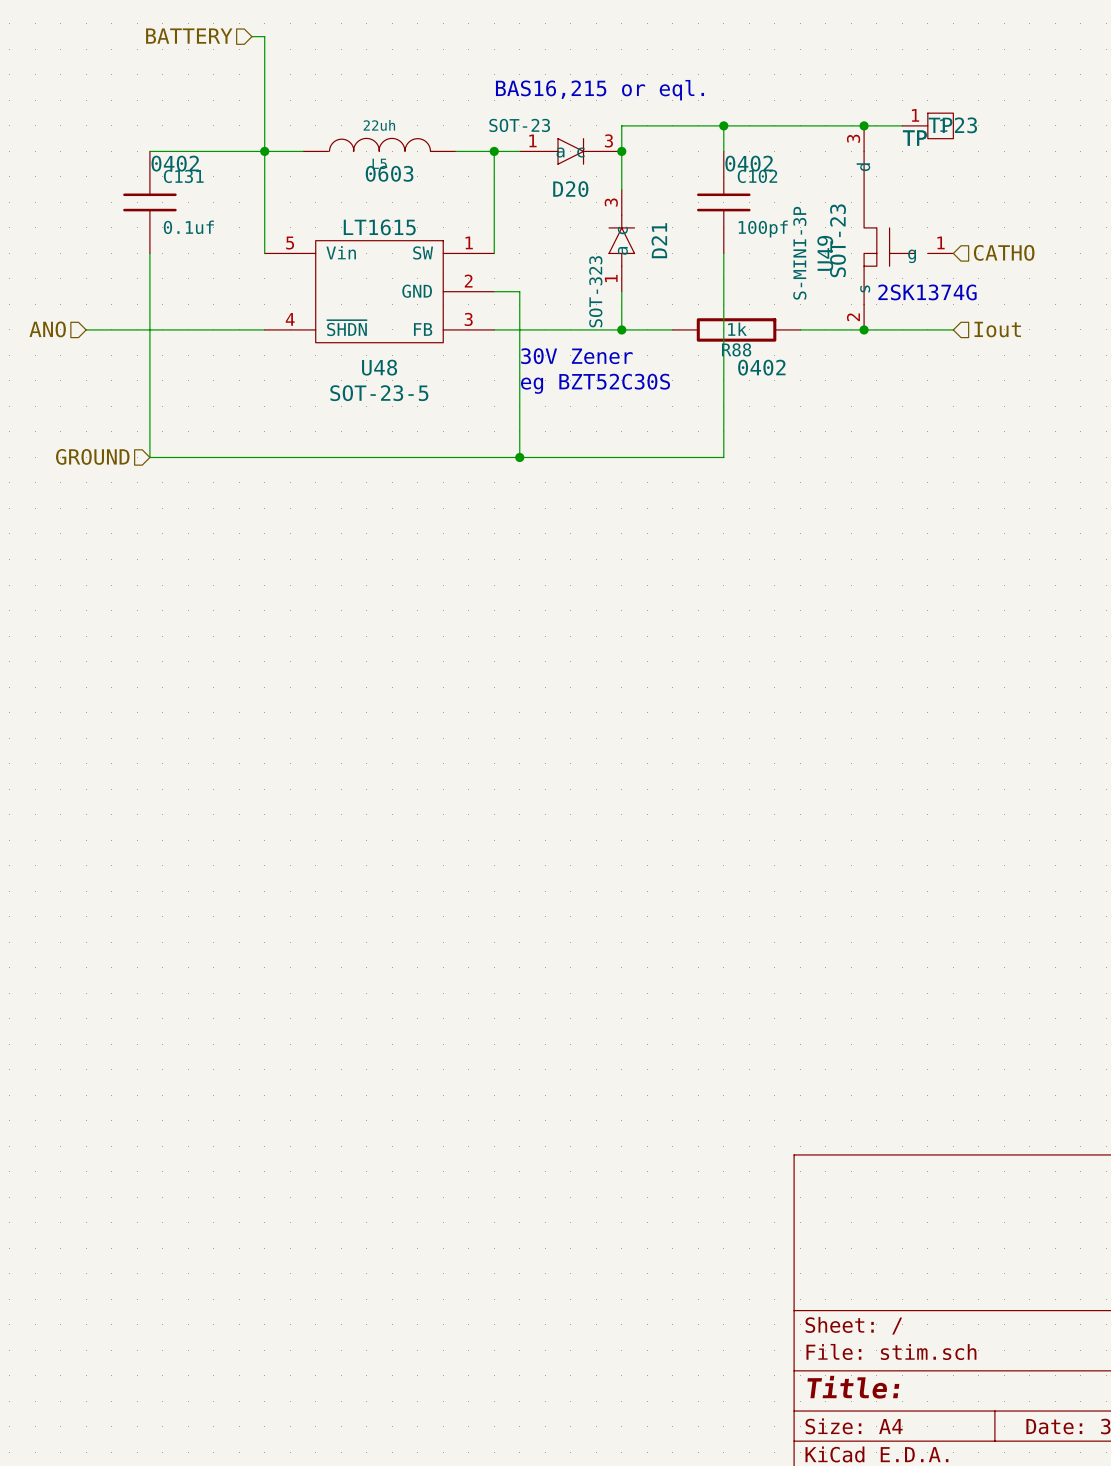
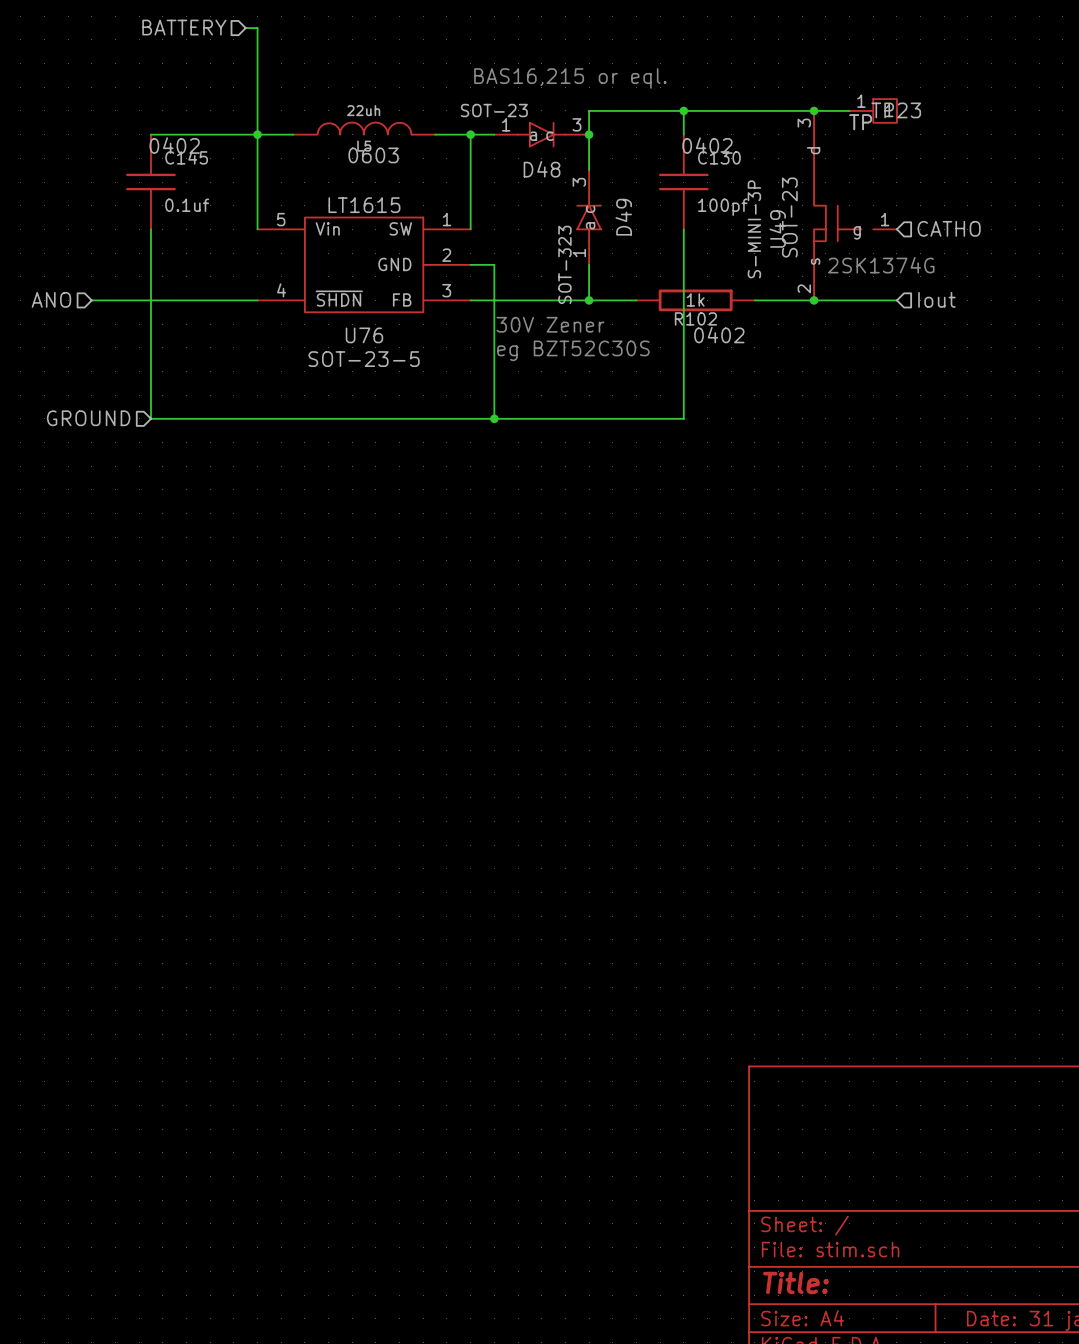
C131 name: C131 (183, 176) -> C145 (186, 157)
C102 name: C102 (757, 176) -> C130 (719, 157)
D20 name: D20 (570, 189) -> D48 (542, 169)
D21 name: D21 (659, 240) -> D49 (623, 217)
R88 name: R88 (736, 349) -> R102 (695, 318)
U48 name: U48 (379, 367) -> U76 (364, 335)

